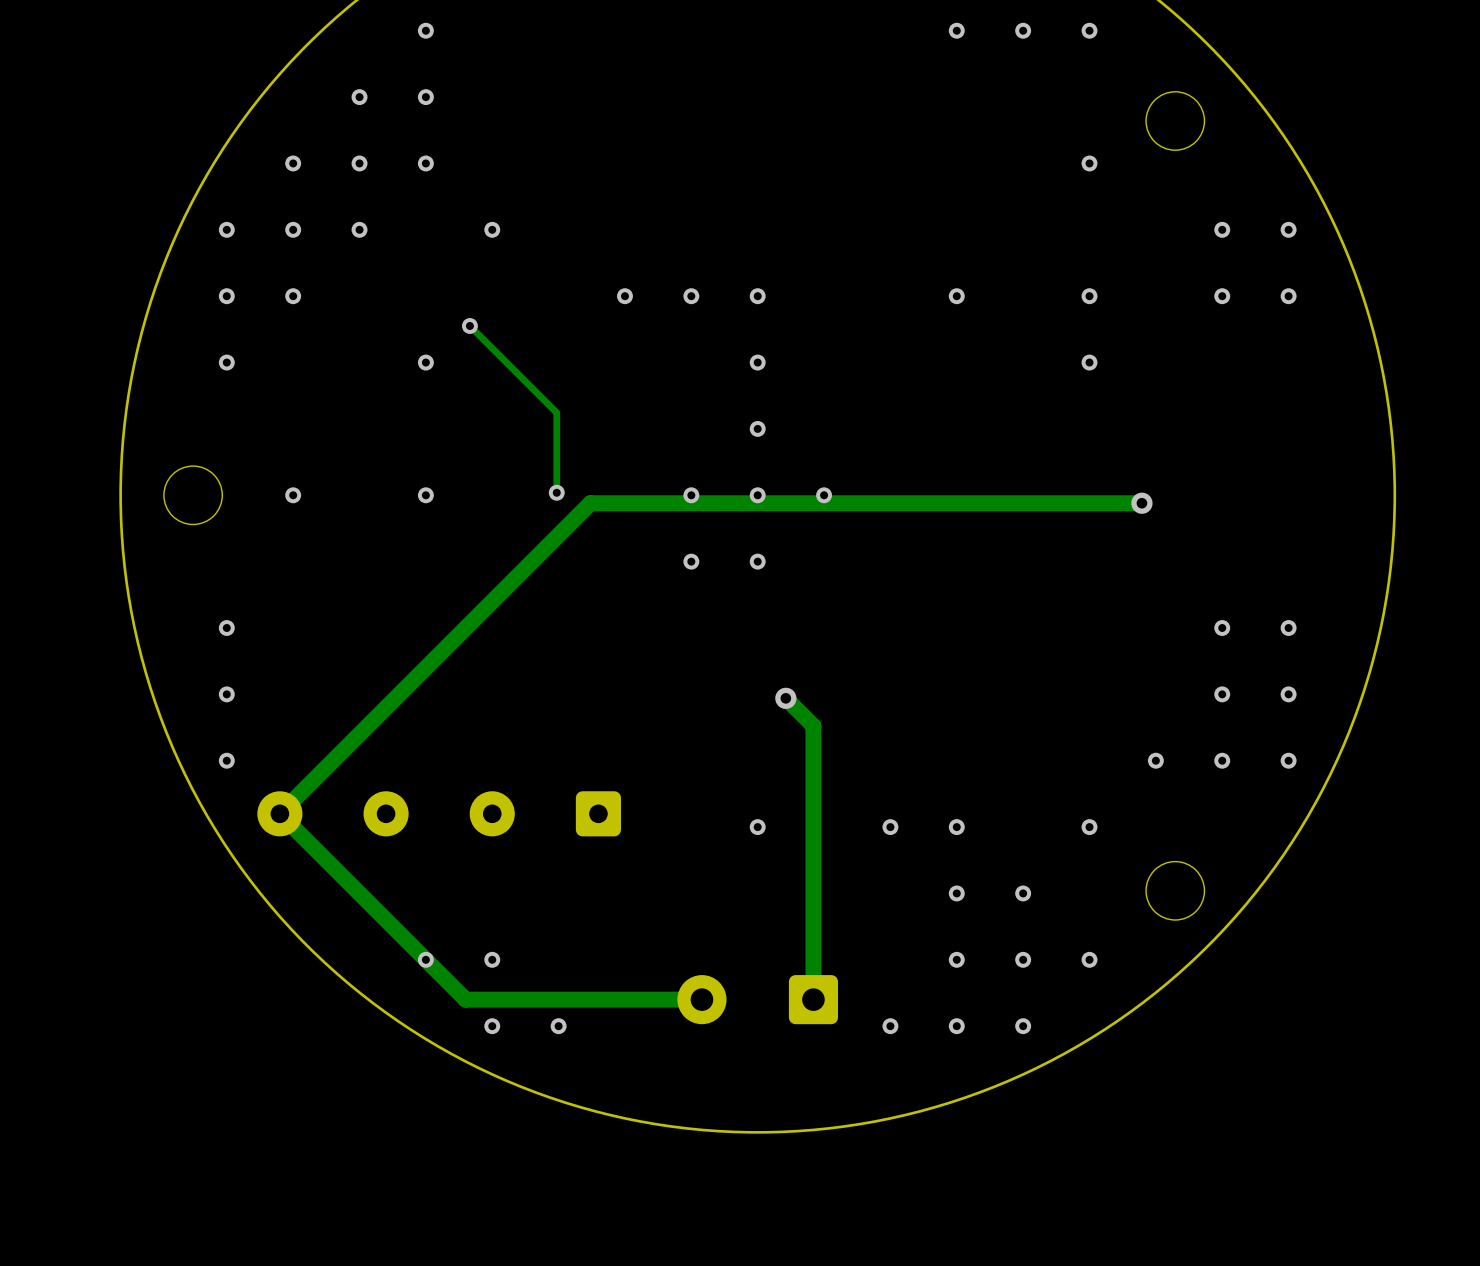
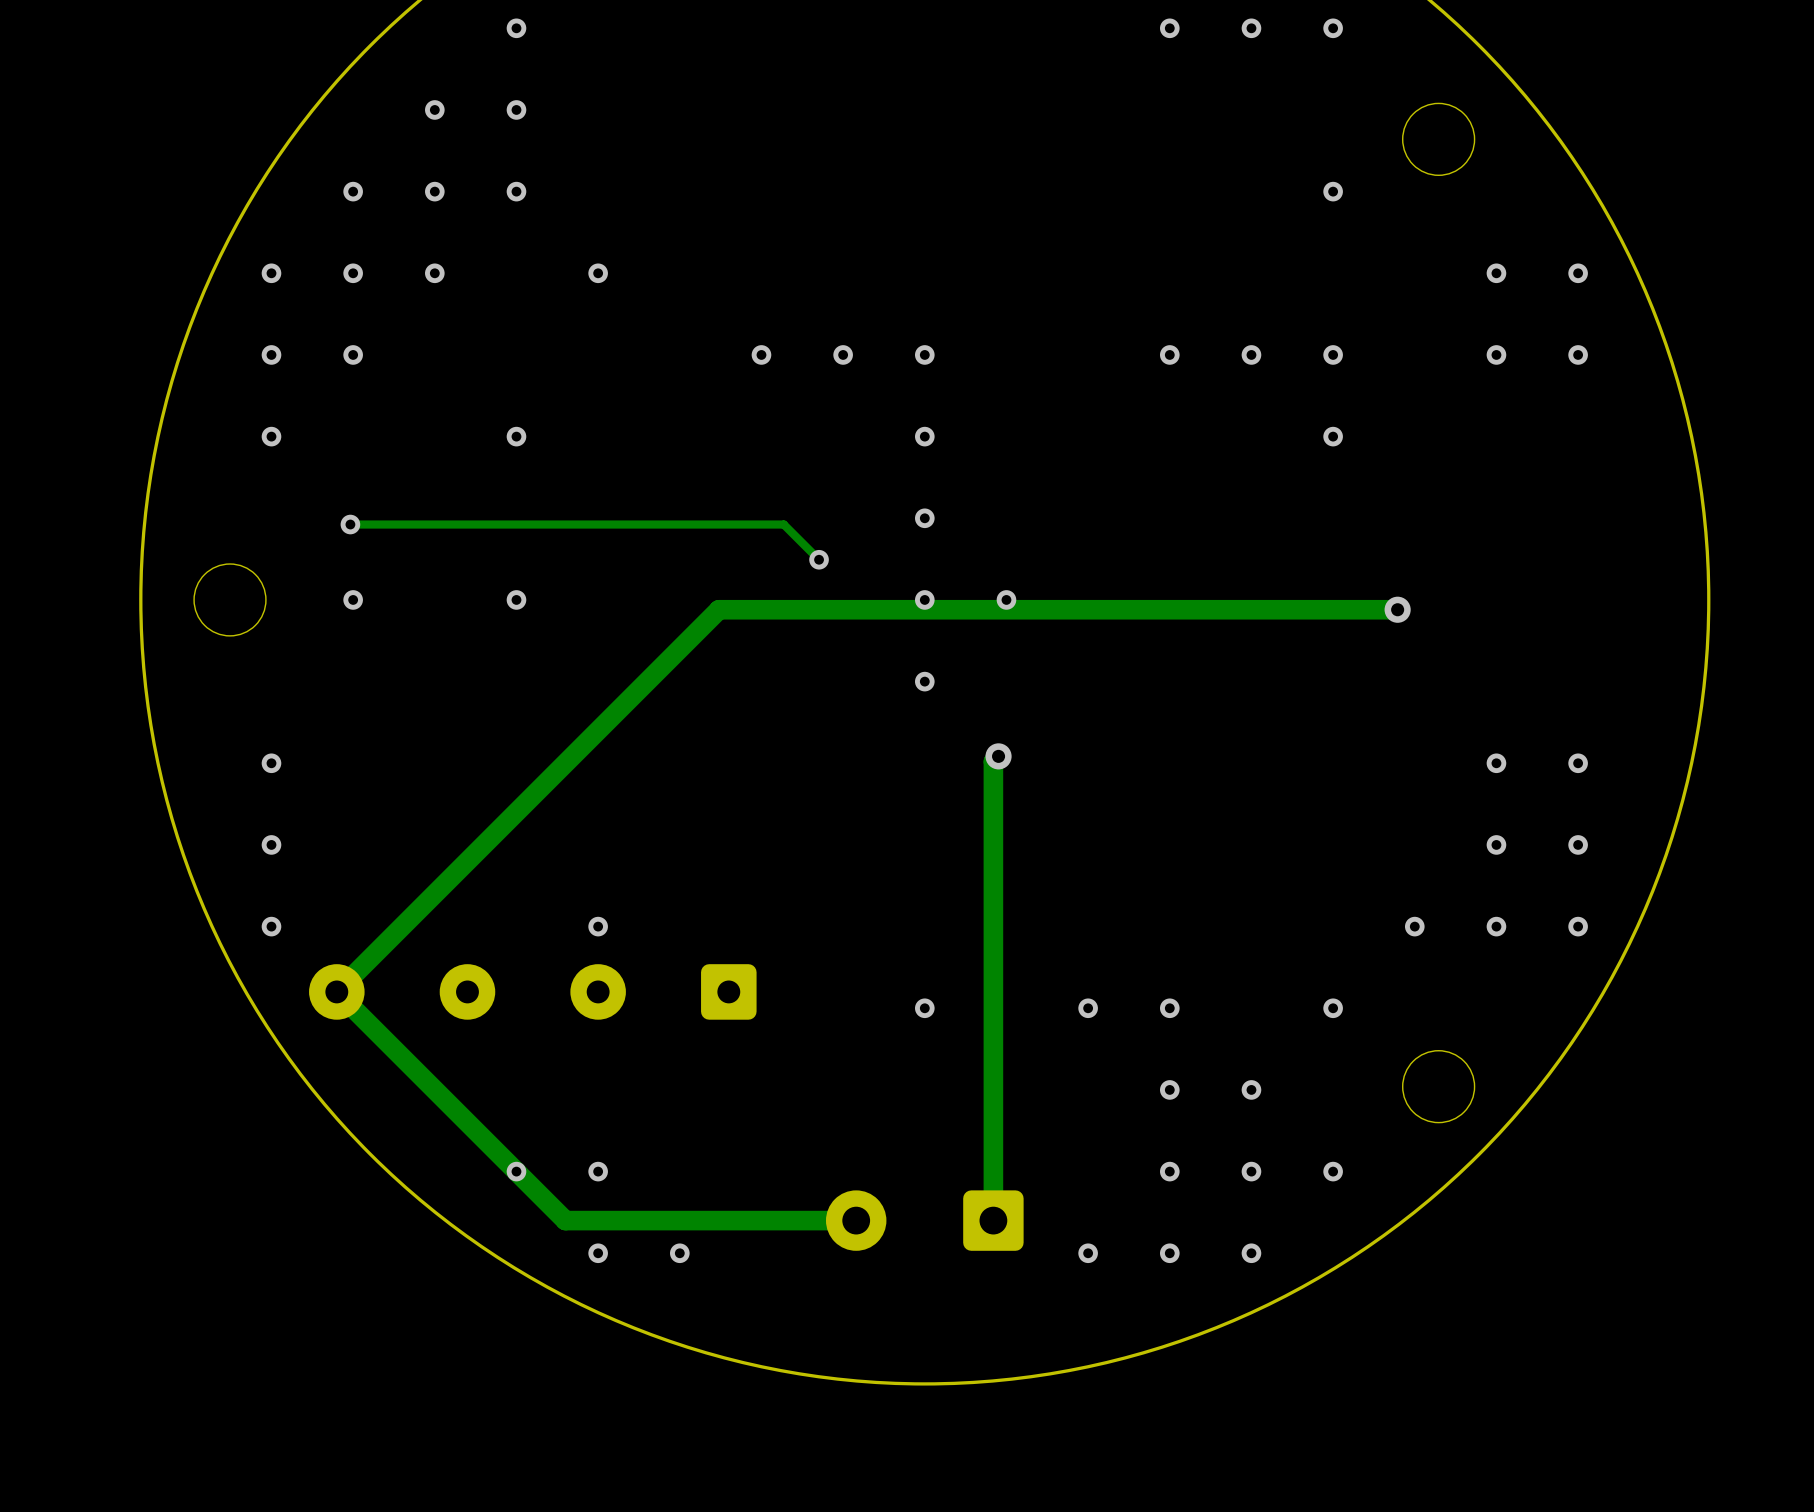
via: none -> (1251, 354)
track: (469, 325) (556, 412) (556, 492) -> none
via: (469, 325) -> none
track: none -> (350, 524) (783, 524) (819, 559)
via: none -> (350, 524)
via: (556, 492) -> none
via position: (691, 495) -> (819, 559)
via: (691, 561) -> none
track: (785, 698) (813, 725) -> (998, 756) (993, 761) (993, 883)
via position: (785, 698) -> (998, 756)
via: none -> (598, 926)

